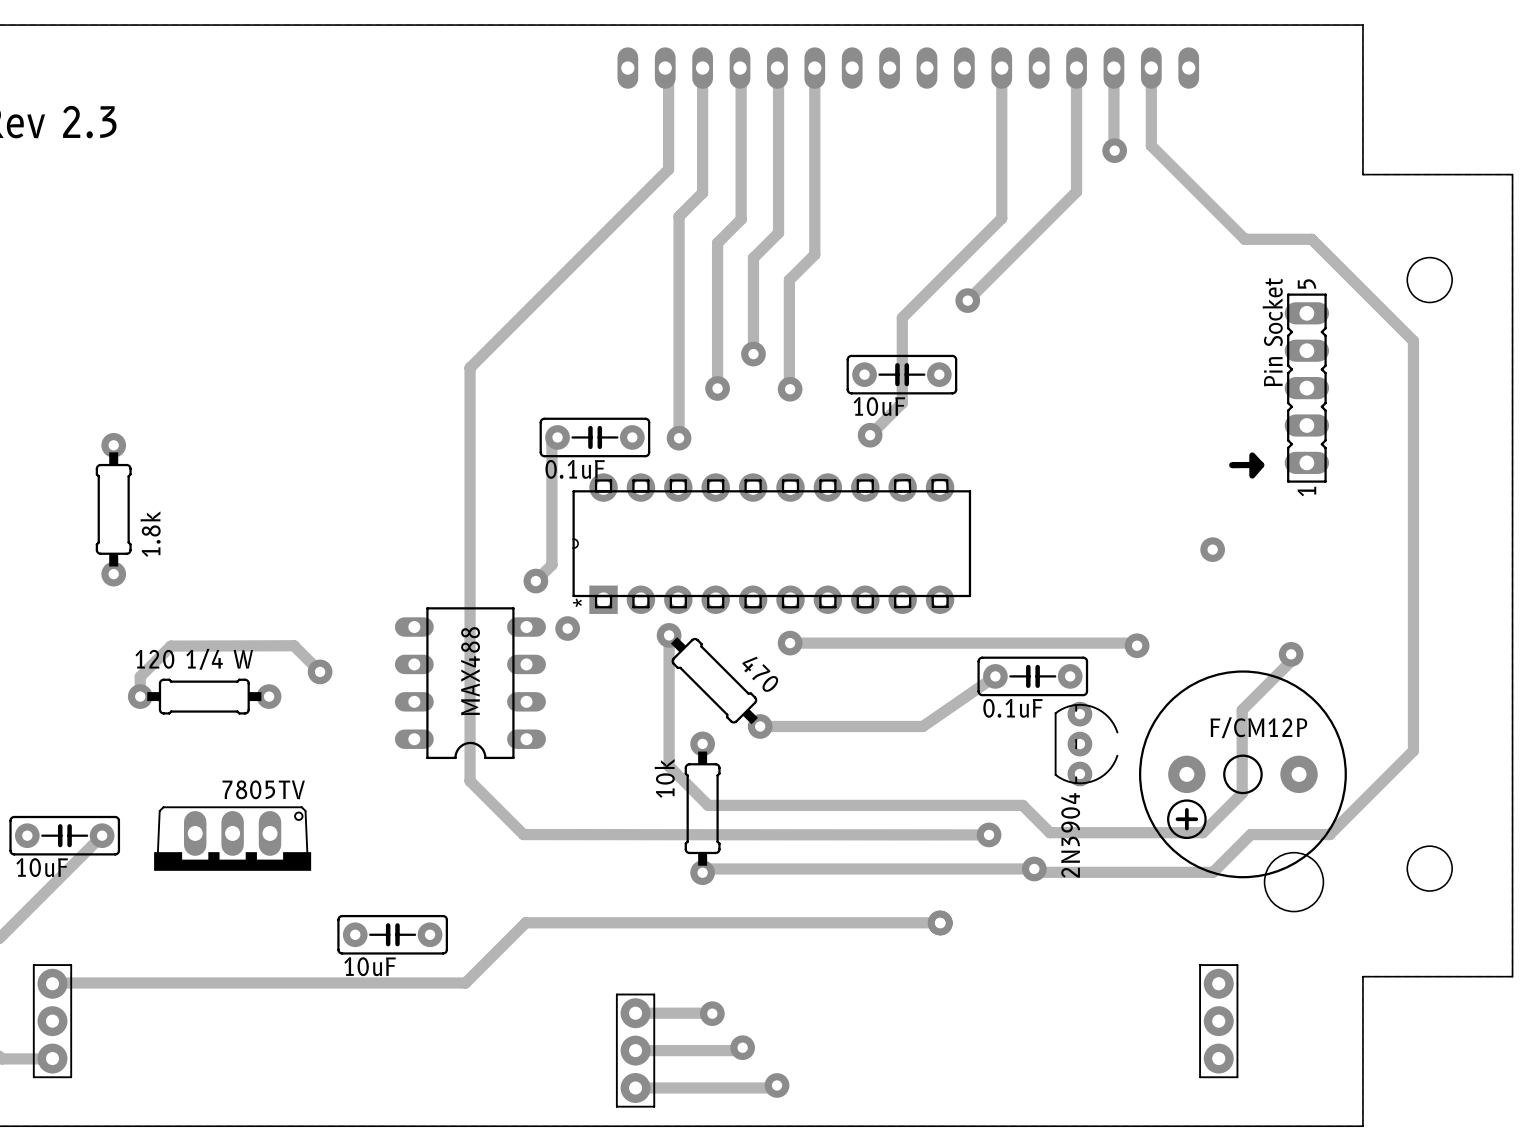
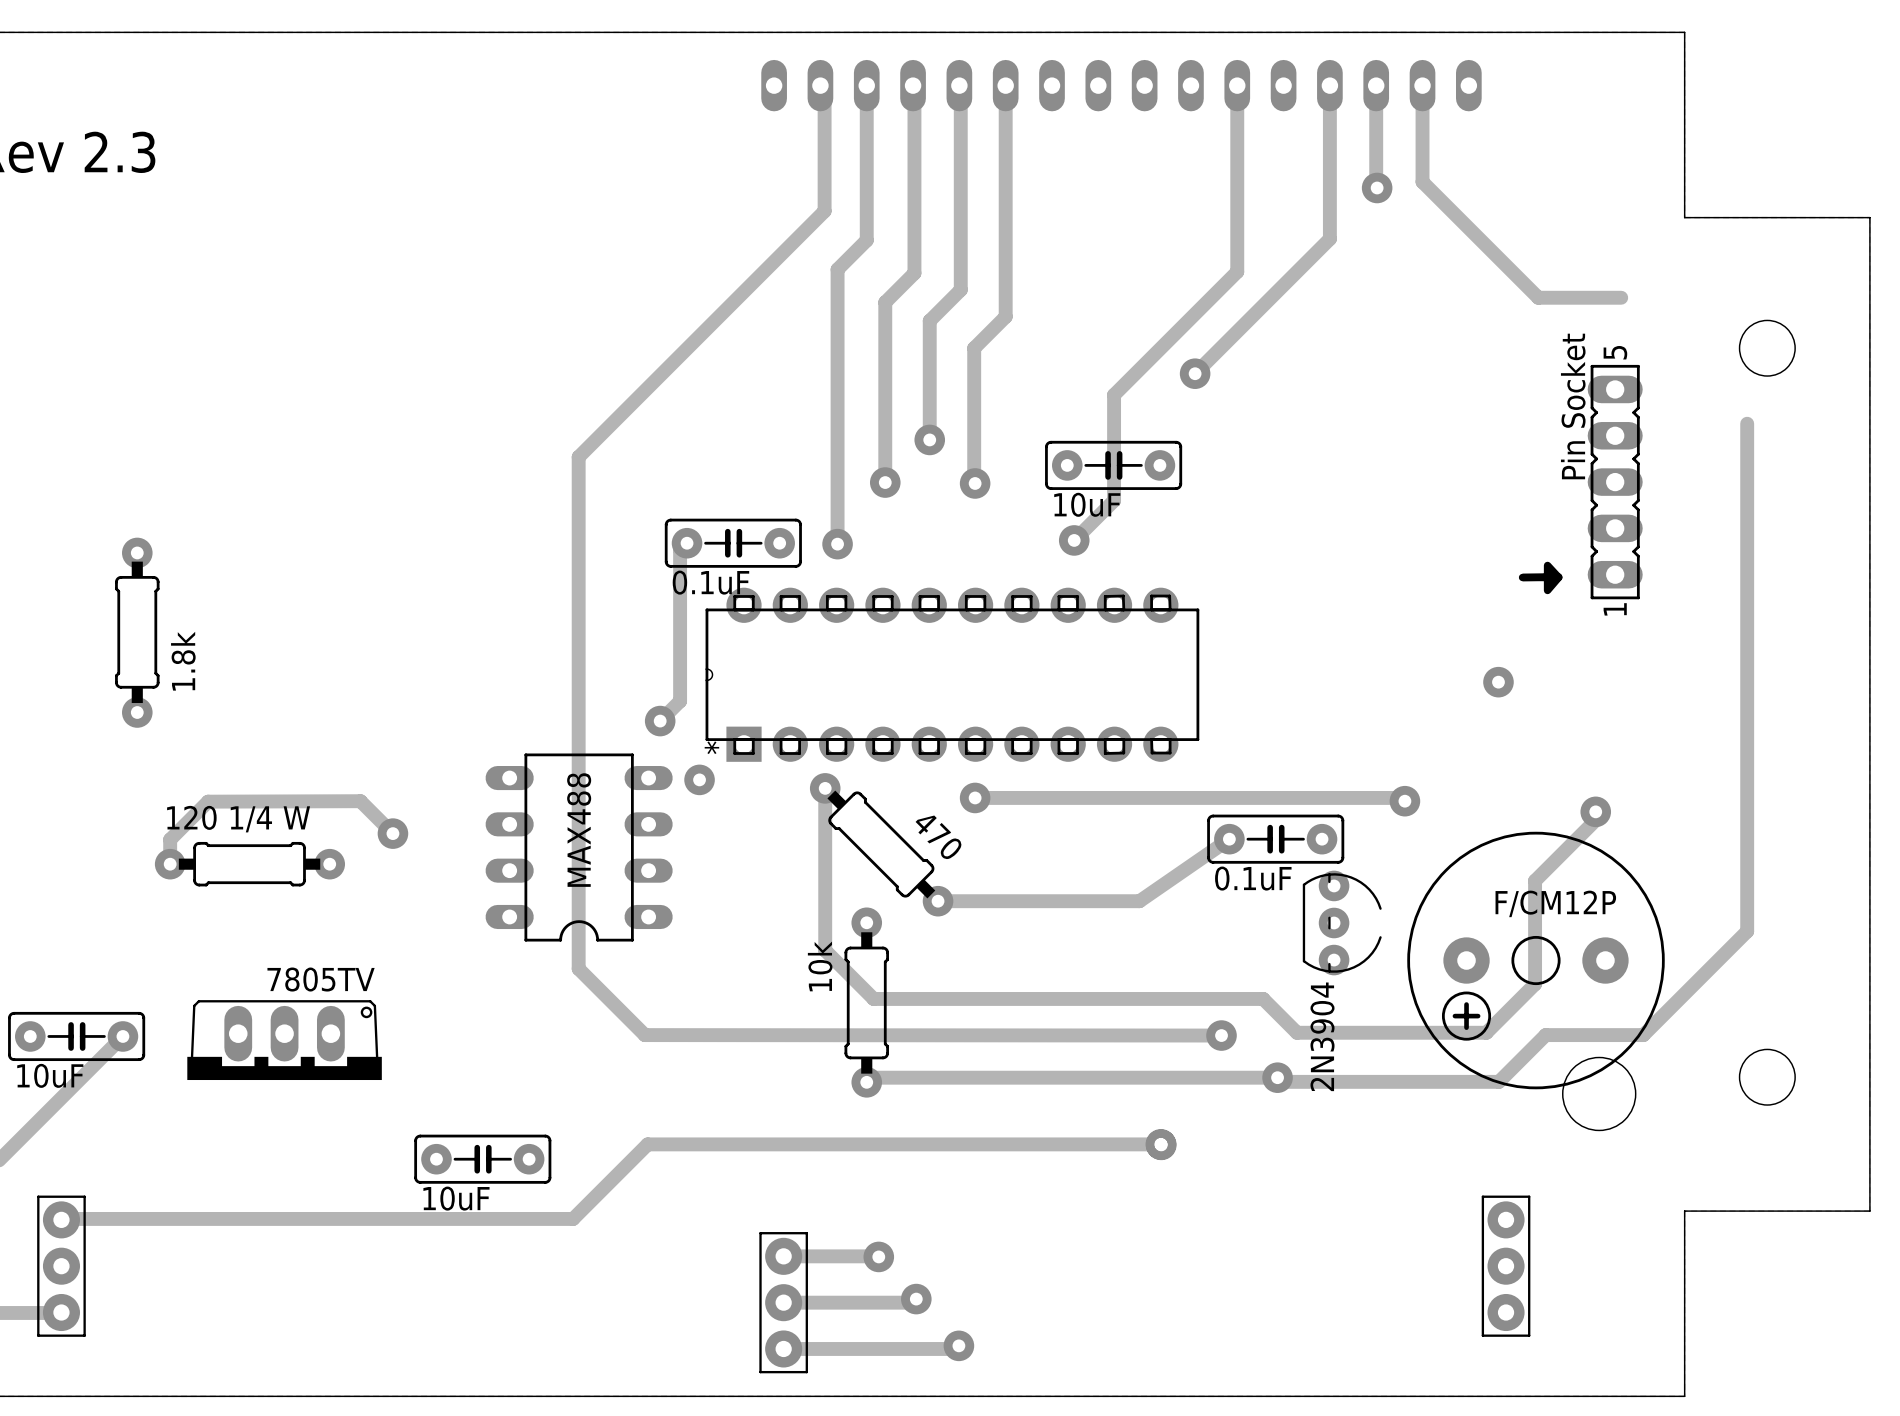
track: (1311, 239) (1413, 340) -> none

